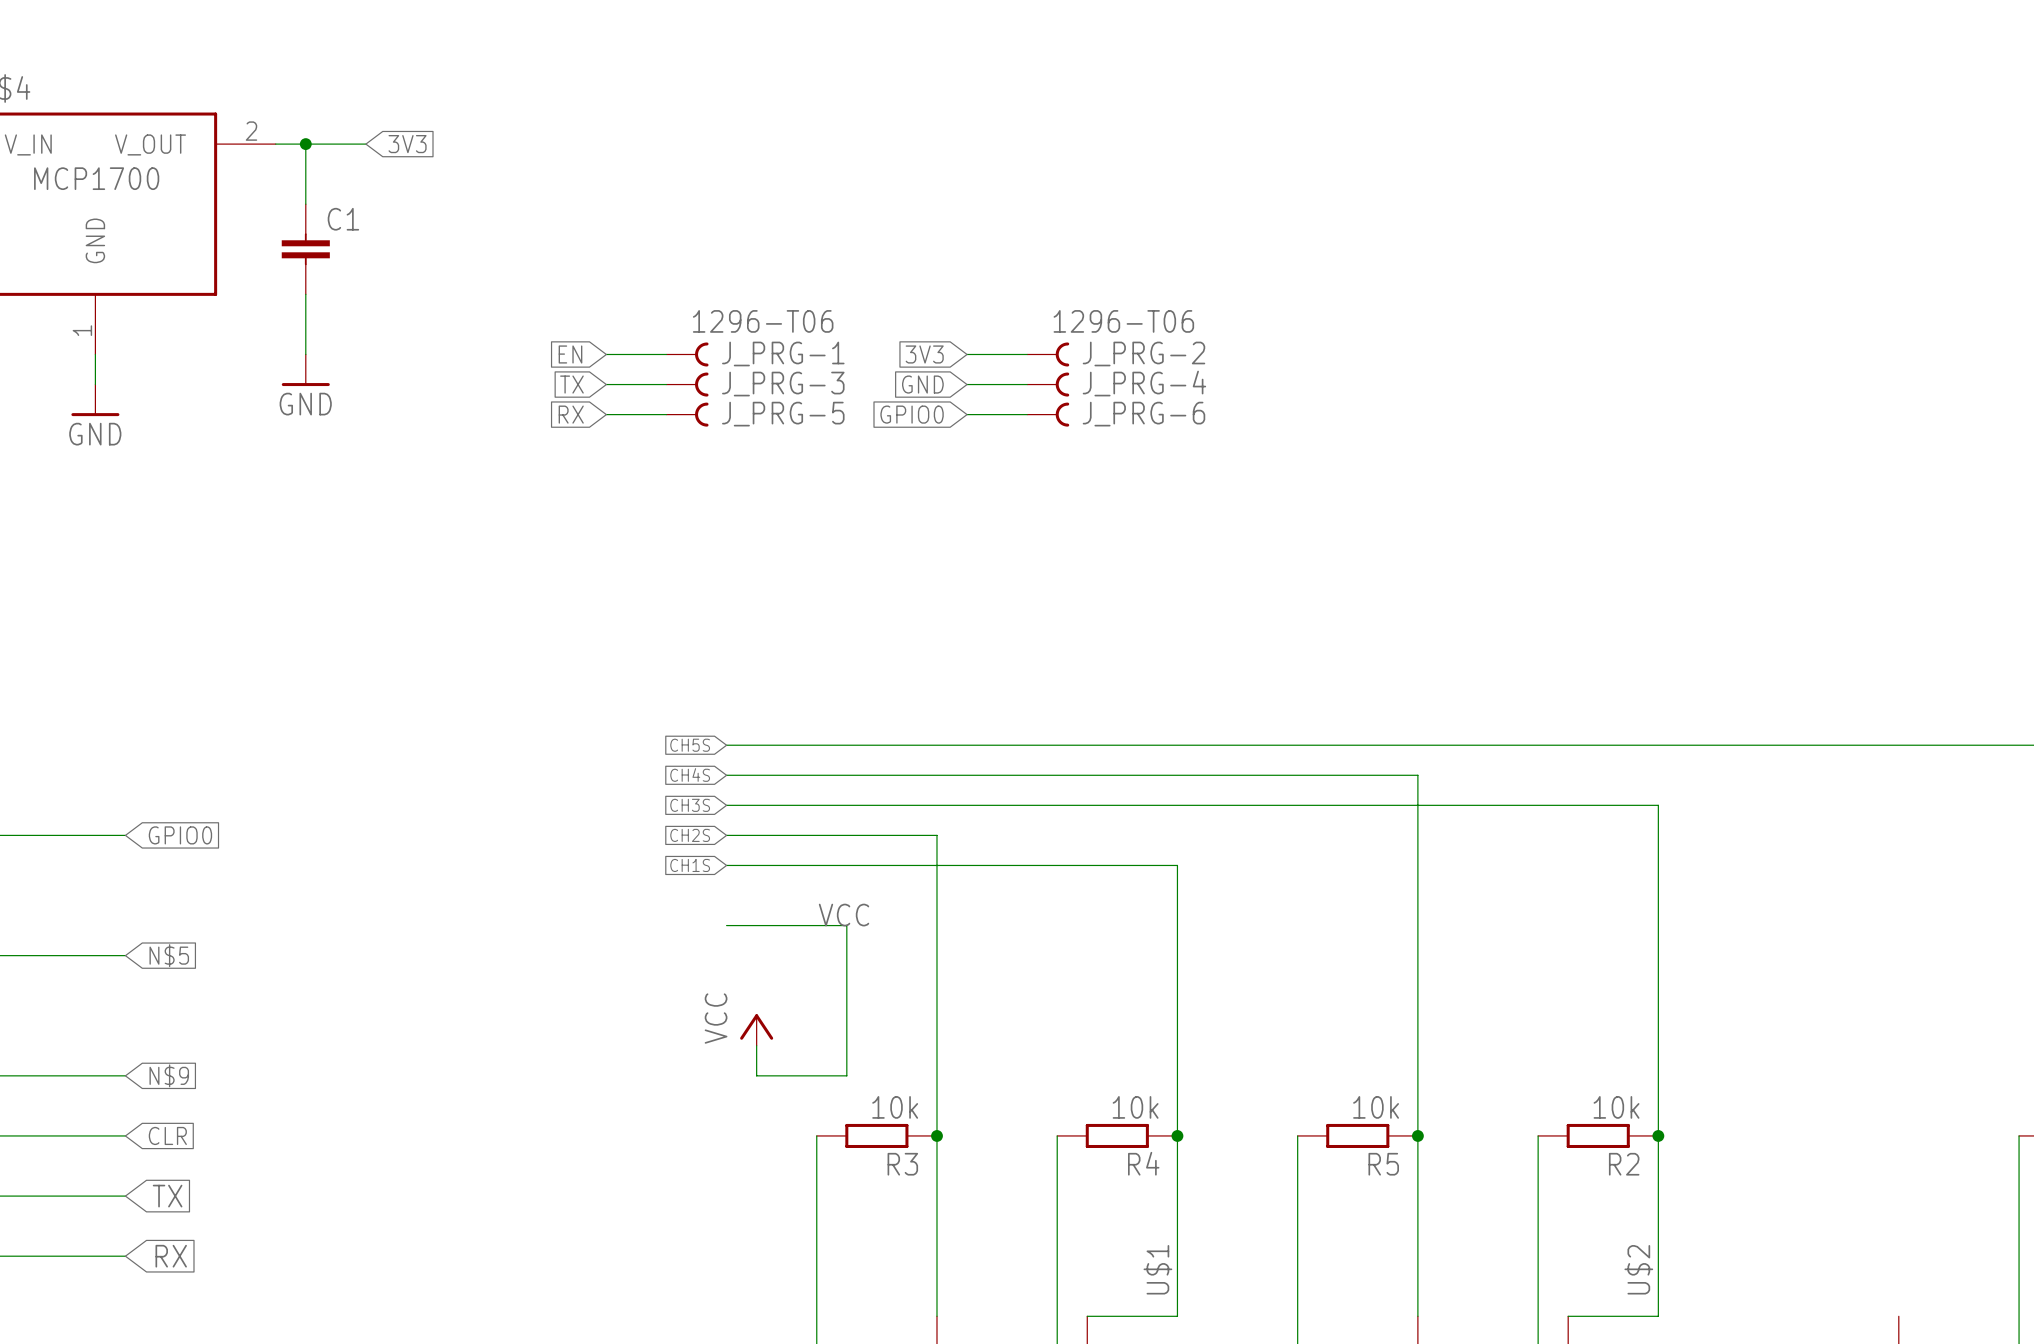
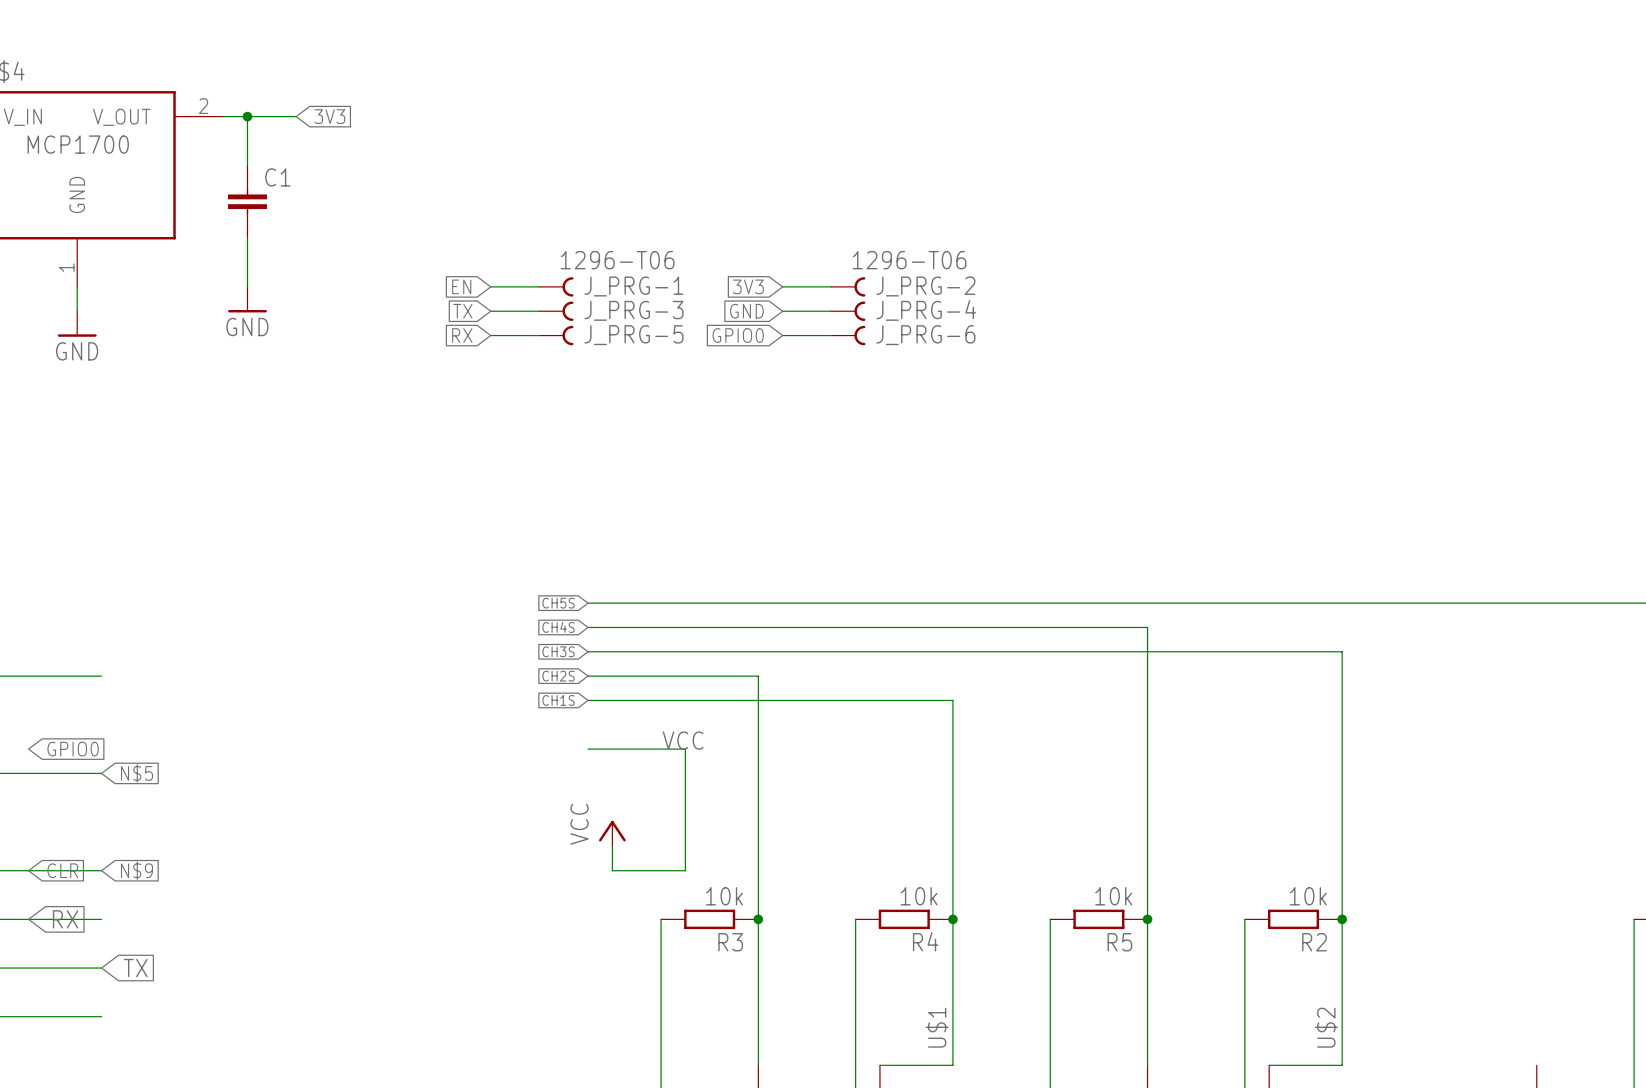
global label position: GPIO0 (180, 835) -> GPIO0 (73, 749)
global label position: CLR (167, 1135) -> CLR (62, 870)
global label position: RX (171, 1256) -> RX (65, 919)

